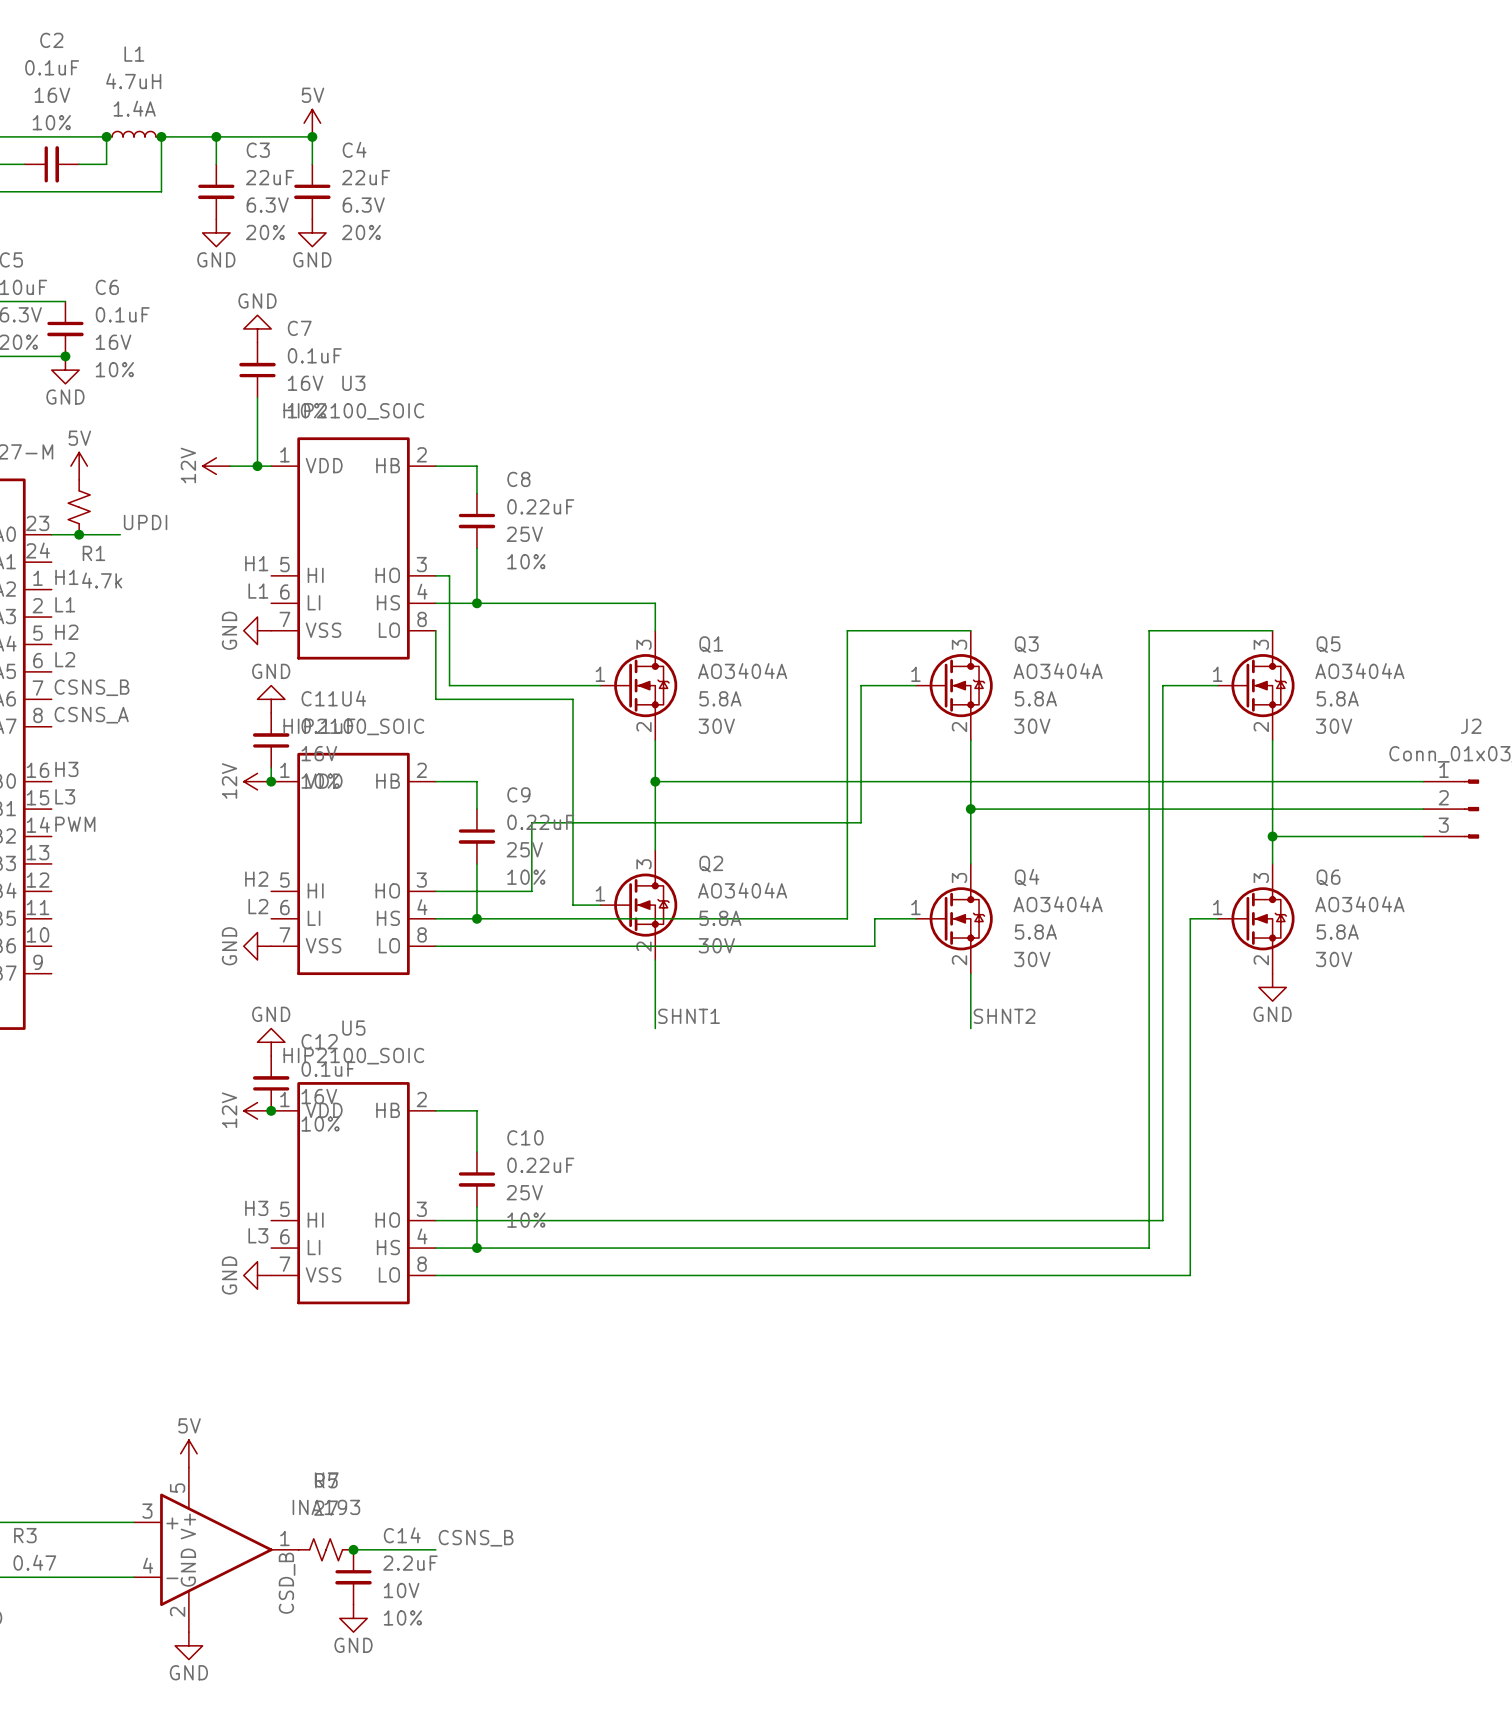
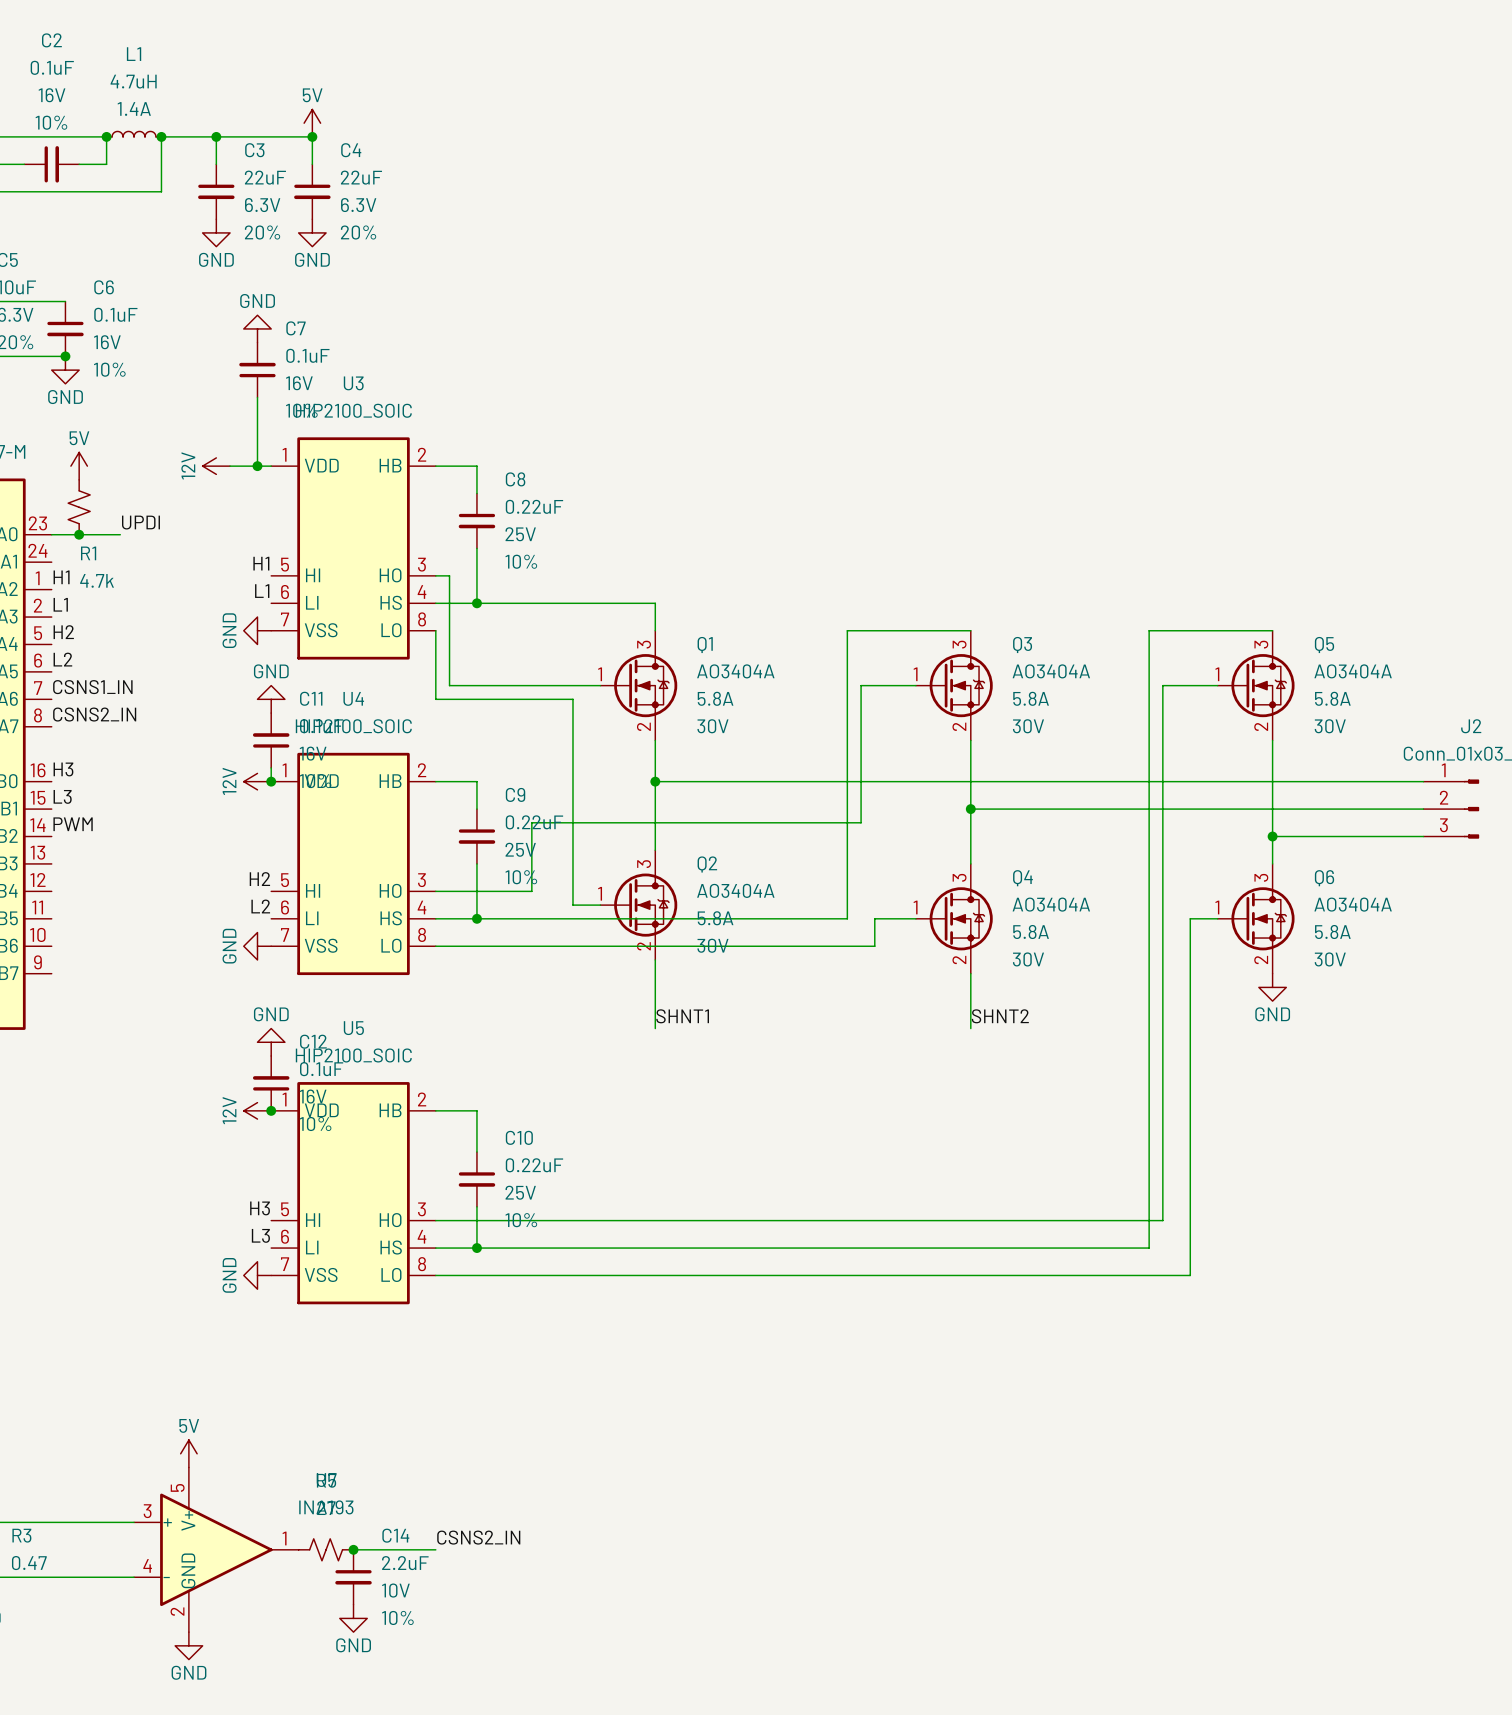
label: CSNS_B (92, 687) -> CSNS1_IN (92, 687)
label: CSNS_A (91, 715) -> CSNS2_IN (94, 714)
label: CSNS_B (476, 1538) -> CSNS2_IN (478, 1537)
label: CSD_B (287, 1583) -> none

